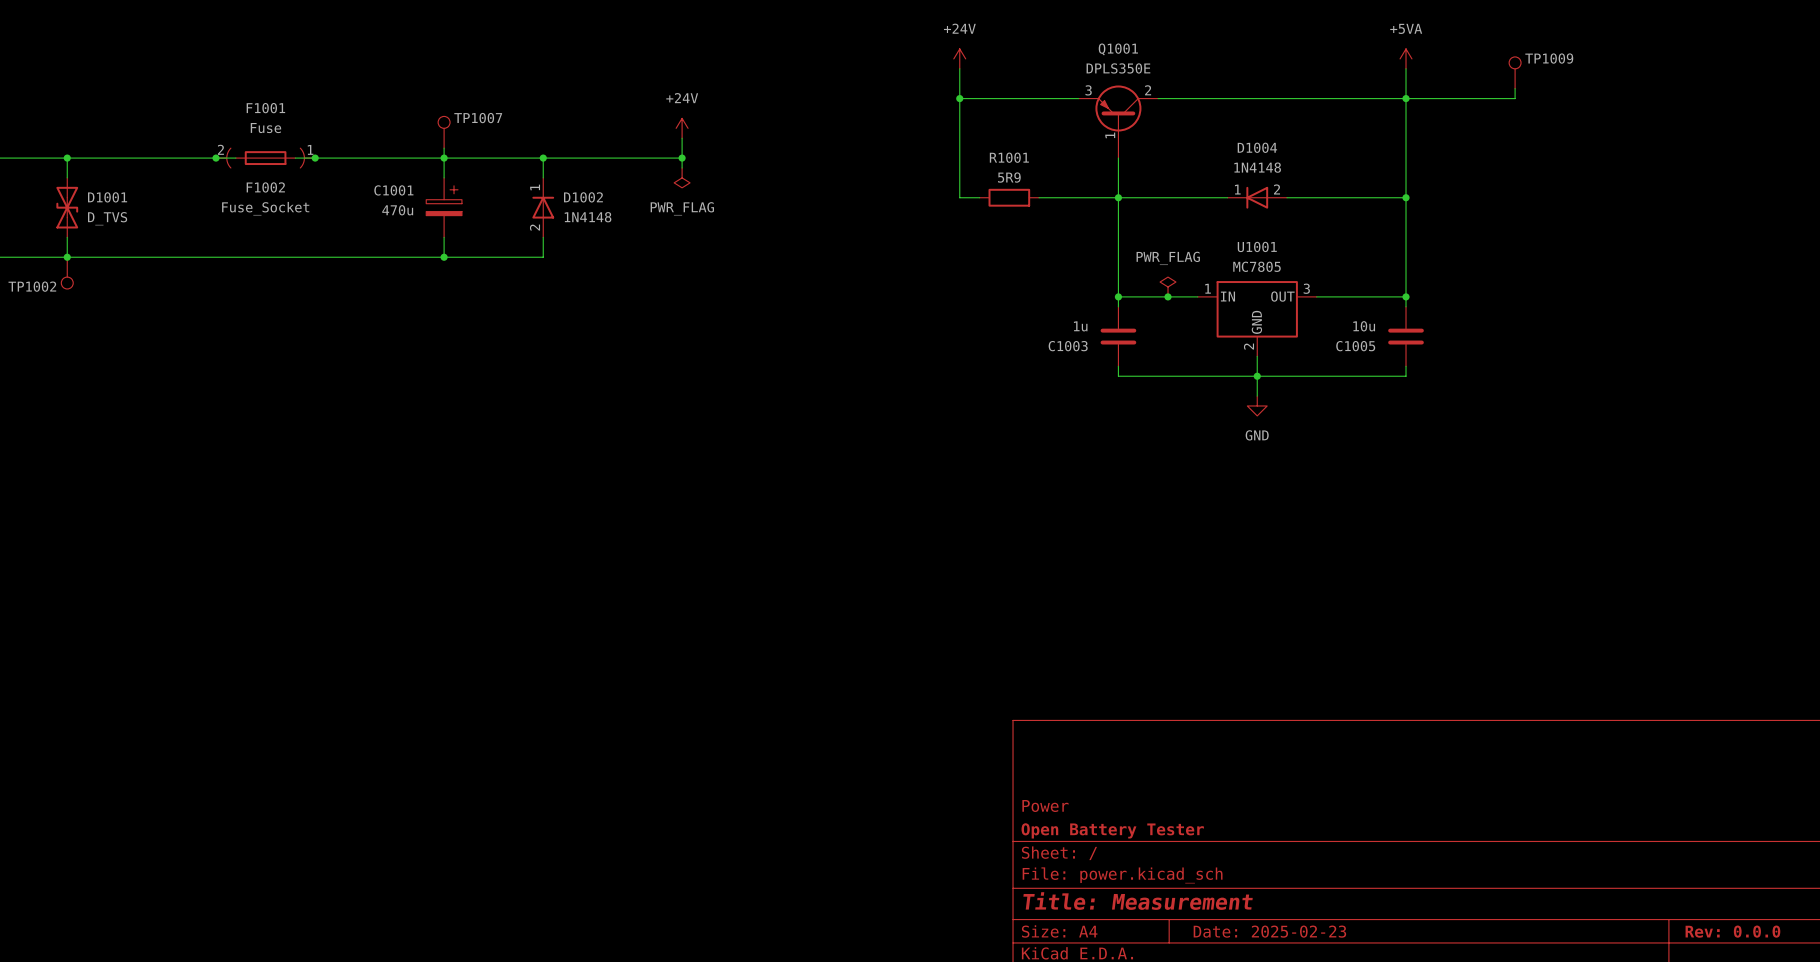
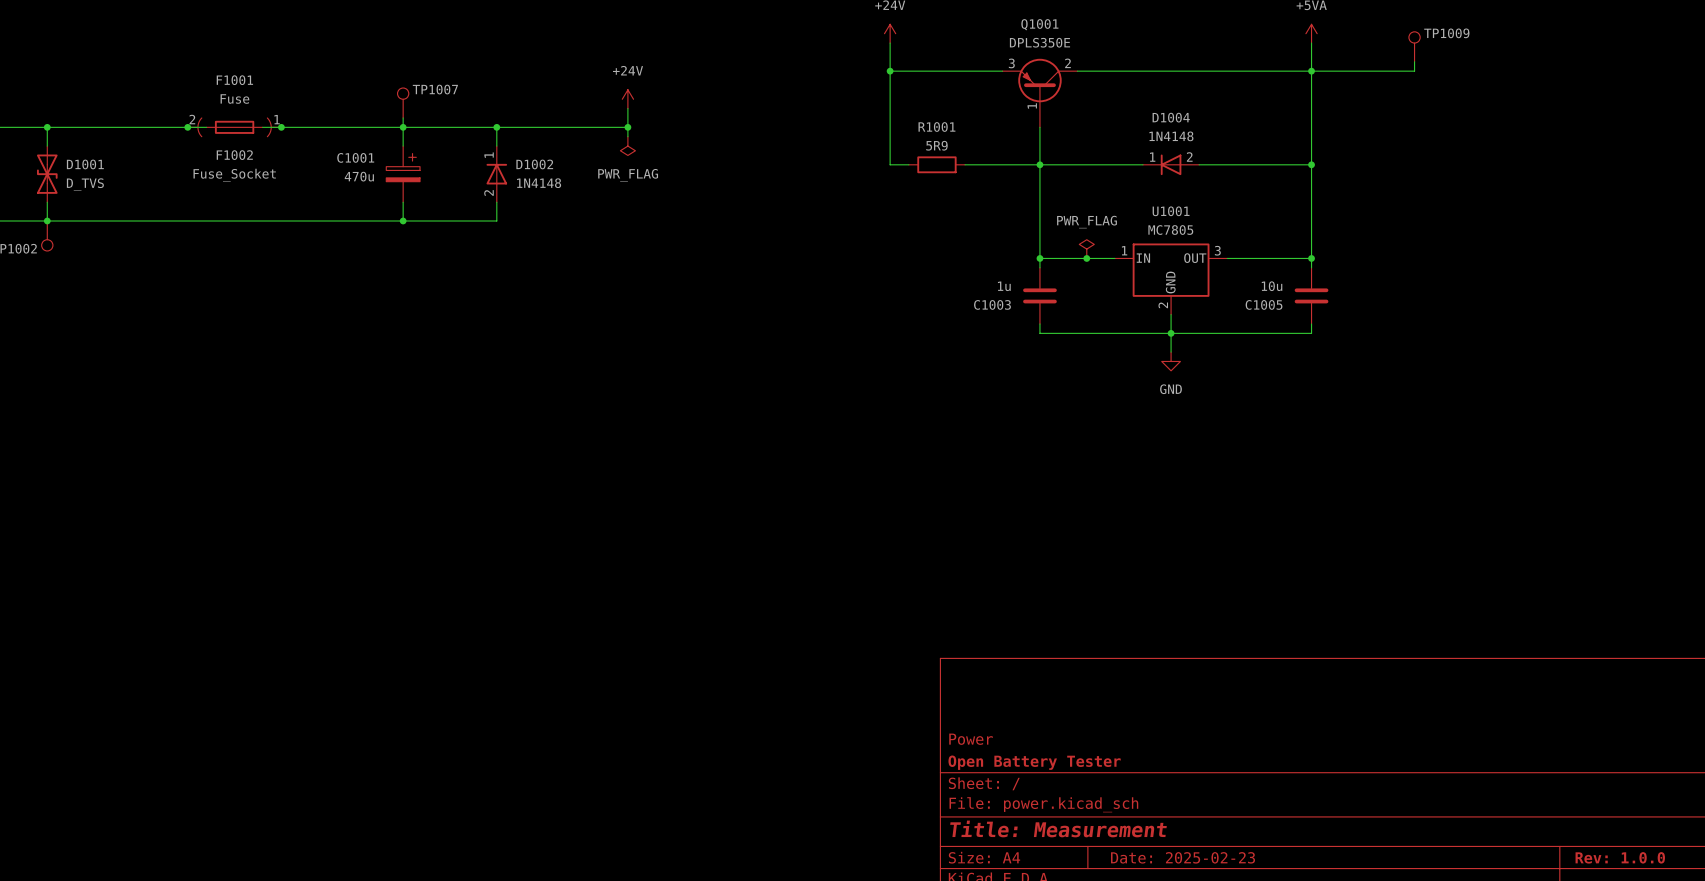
title block: Rev: 0.0.0 (1732, 931) -> Rev: 1.0.0 (1620, 857)

